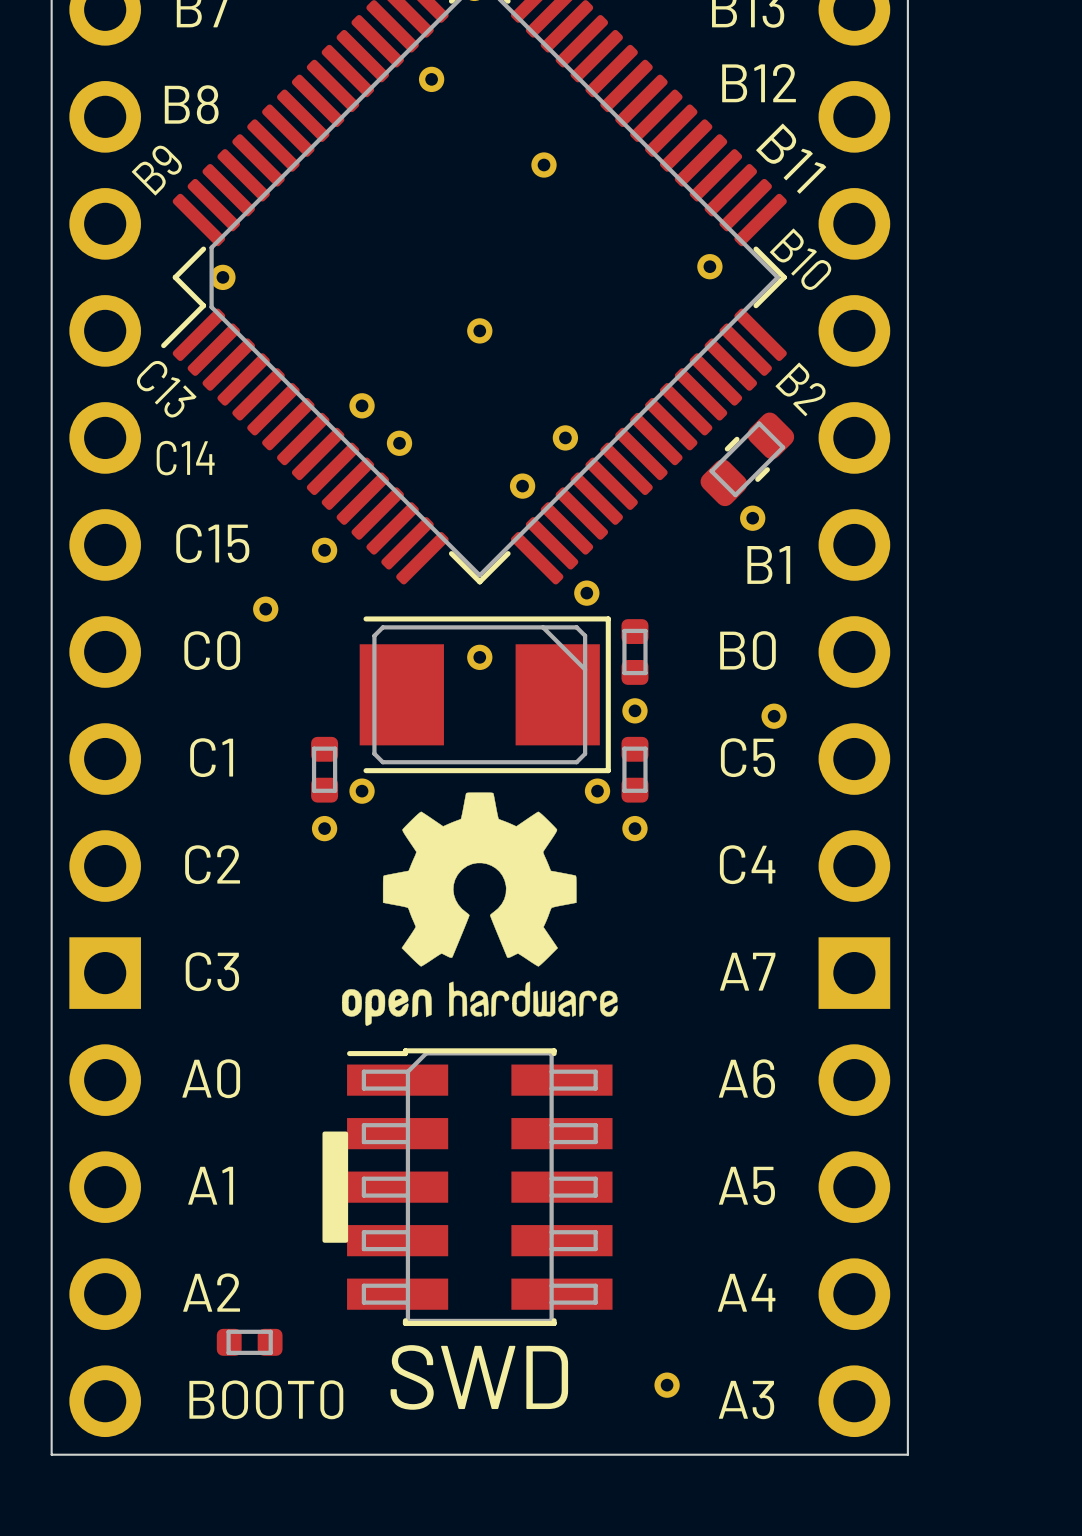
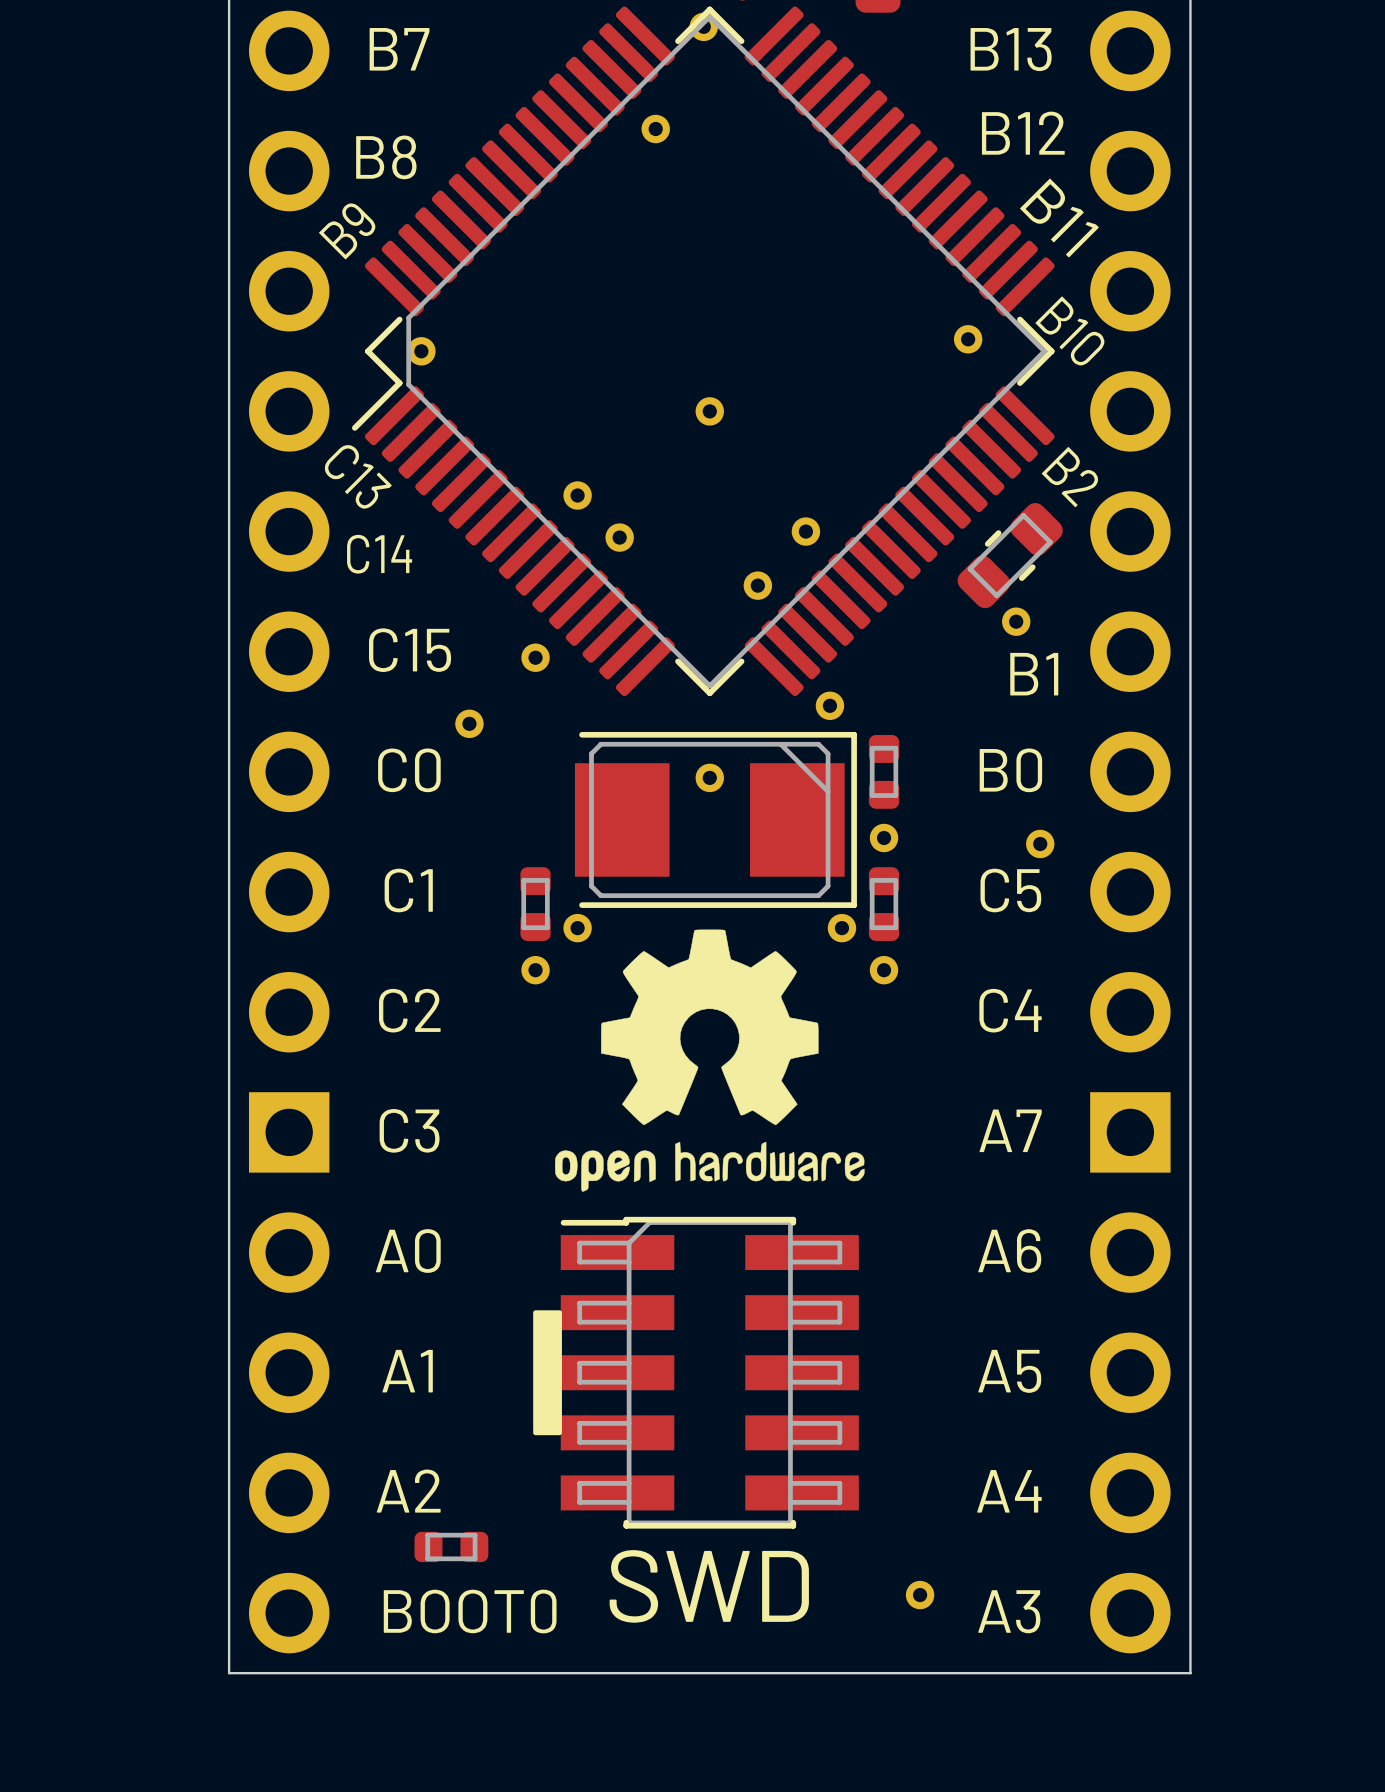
part: (543, 165) -> none

